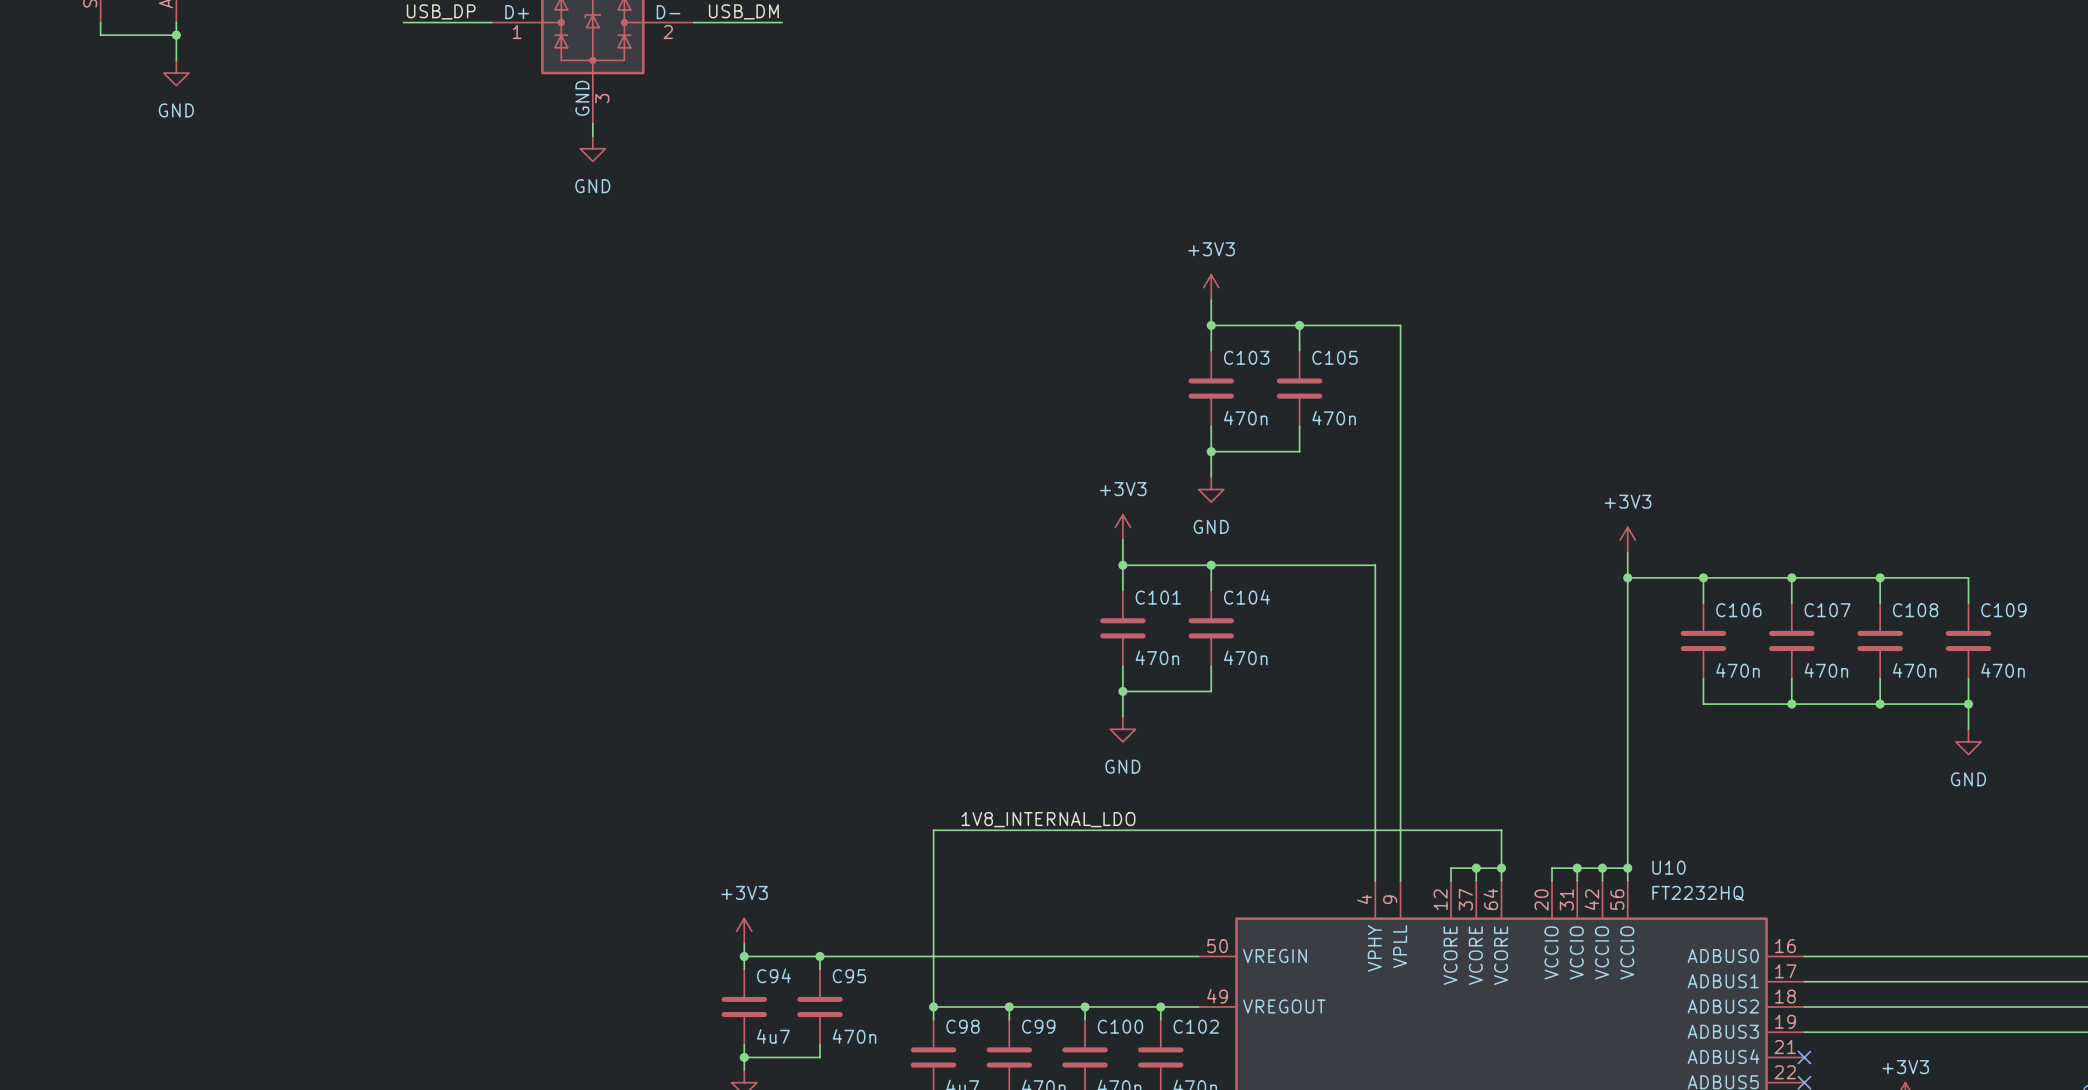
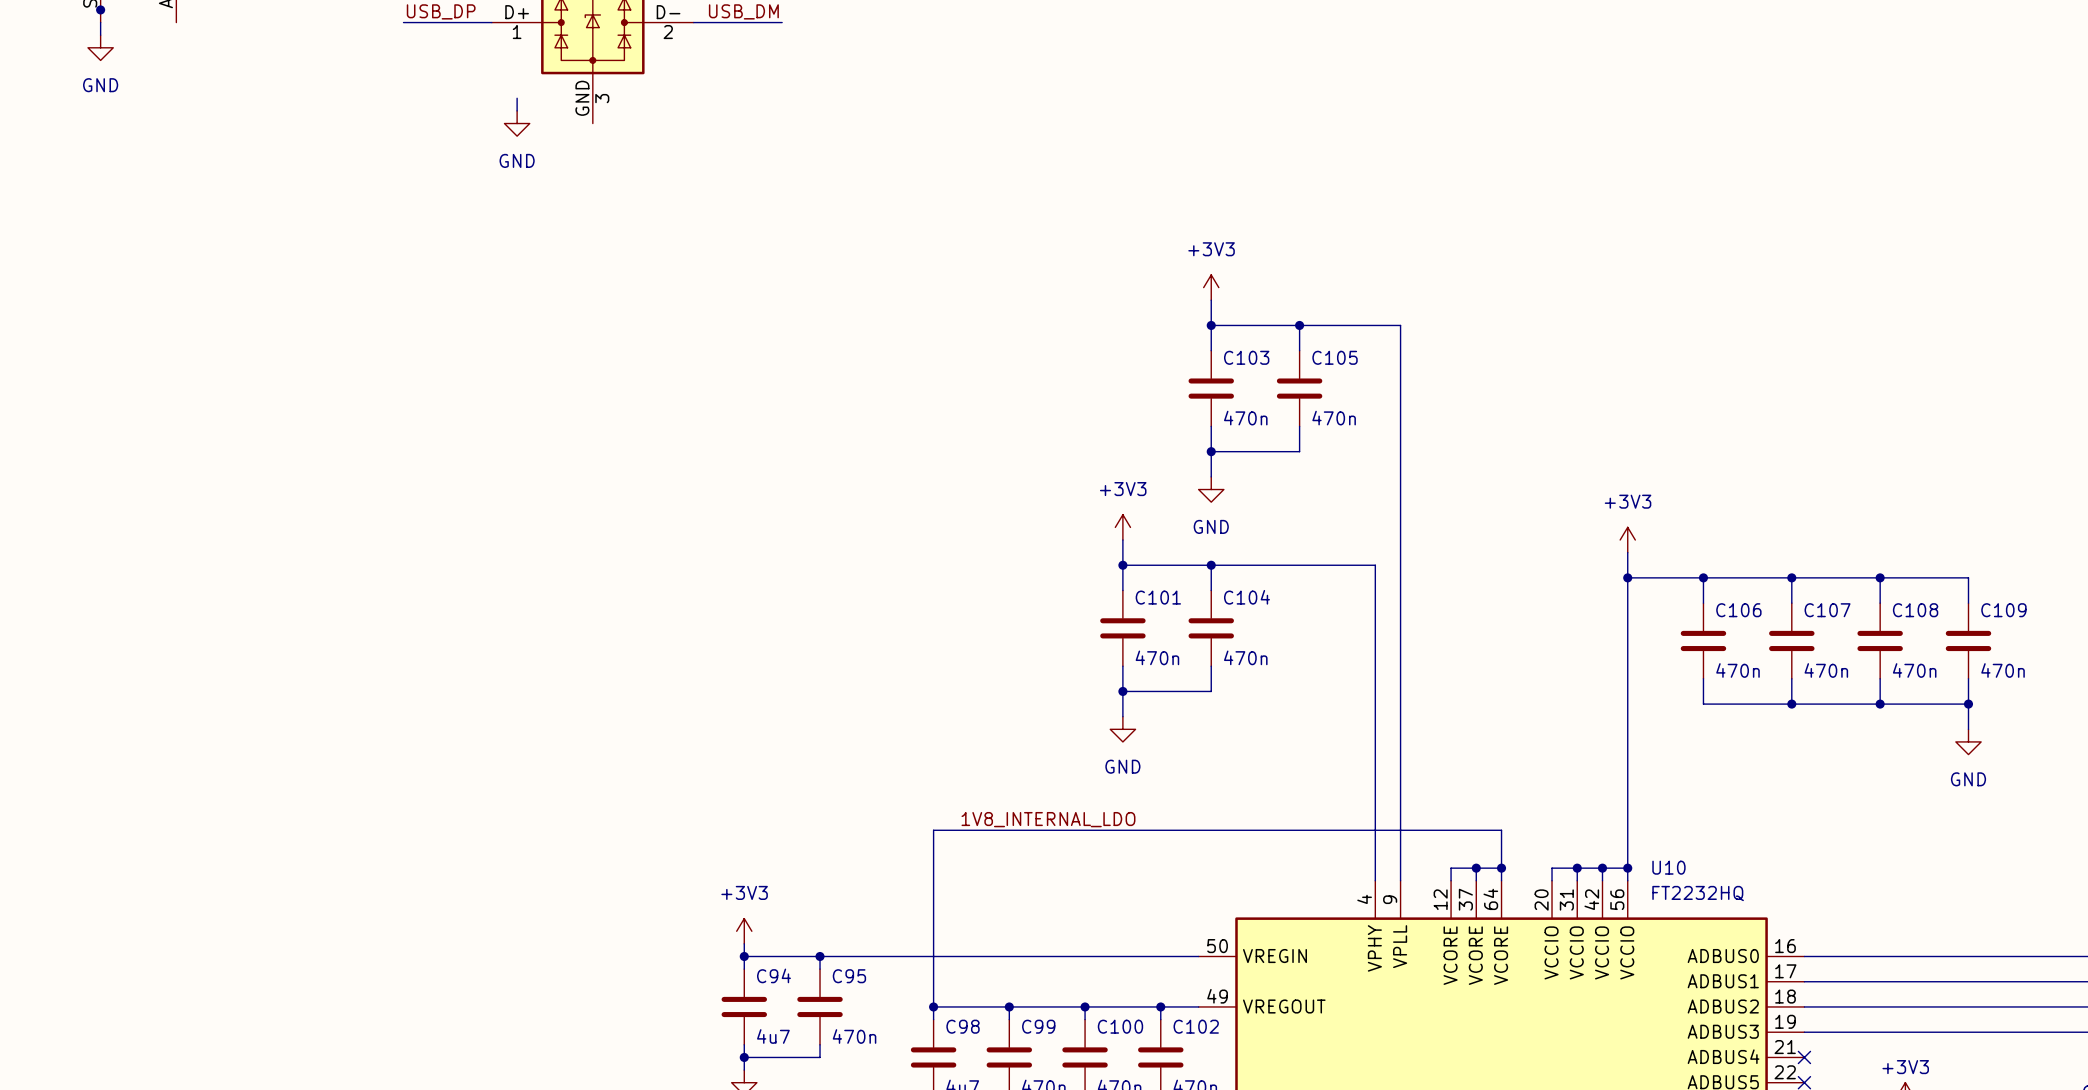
junction: none -> (100, 9)
wire: (176, 22) (176, 60) -> none
wire: (100, 35) (176, 35) -> none
junction: (176, 35) -> none
power symbol position: GND (176, 73) -> GND (100, 47)
wire: (592, 123) (592, 136) -> (517, 98) (517, 110)
power symbol position: GND (592, 148) -> GND (517, 123)

